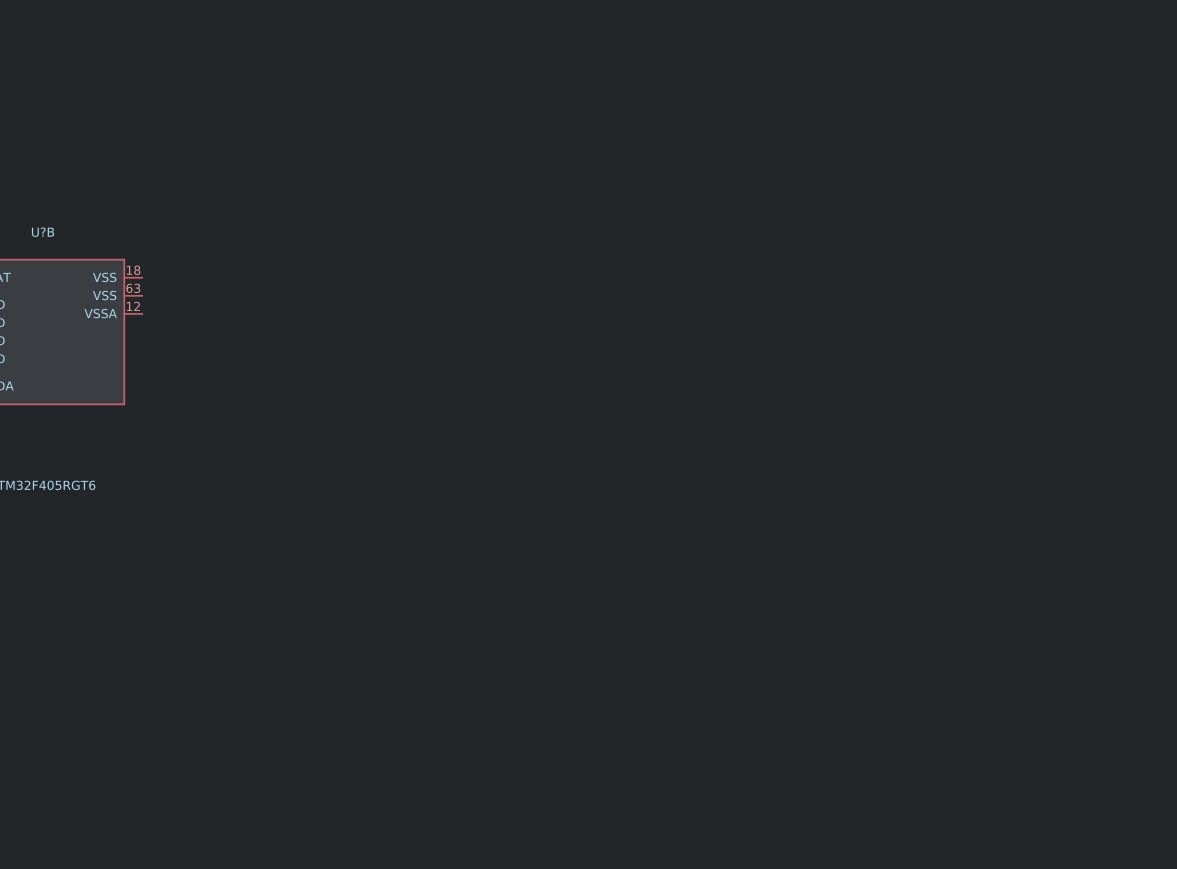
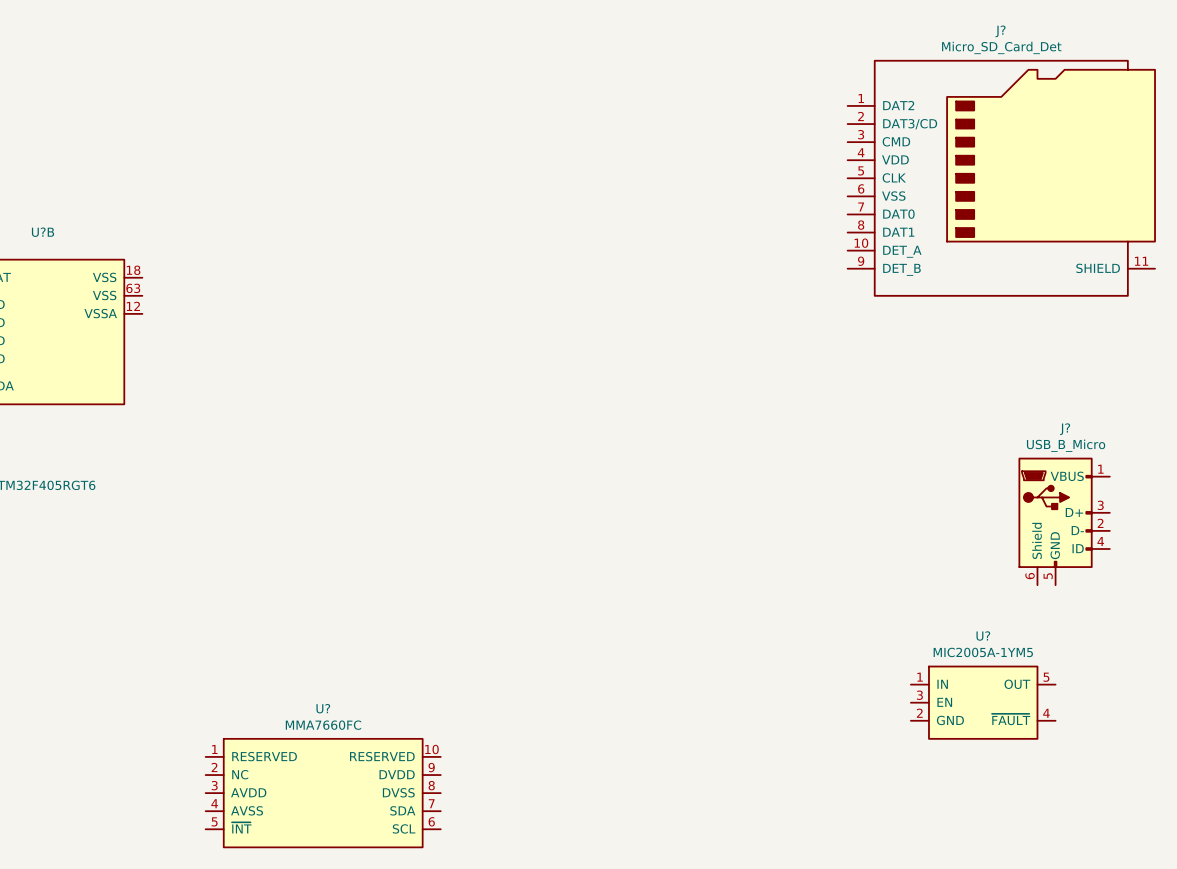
J?: none -> Micro_SD_Card_Det (1001, 178)
J?: none -> USB_B_Micro (1064, 521)
U?: none -> MIC2005A-1YM5 (983, 702)
U?: none -> MMA7660FC (323, 793)

